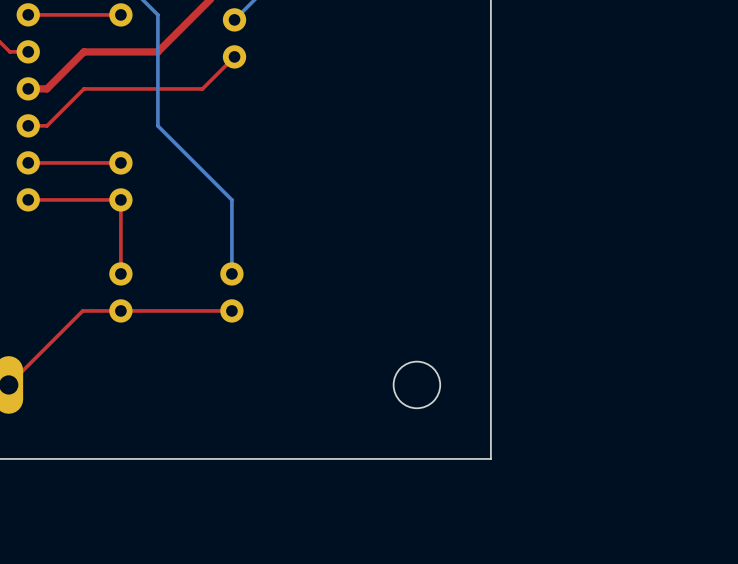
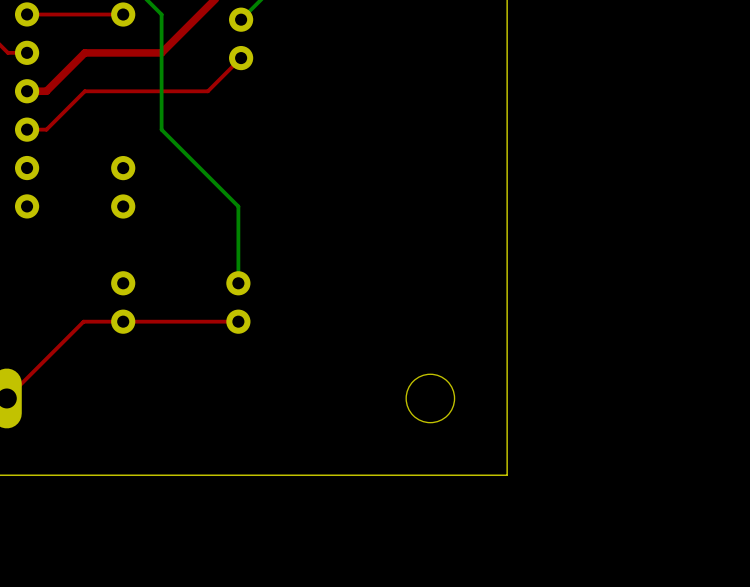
top track: (120, 162) (28, 162) -> none
top track: (28, 199) (120, 199) (120, 273) -> none

